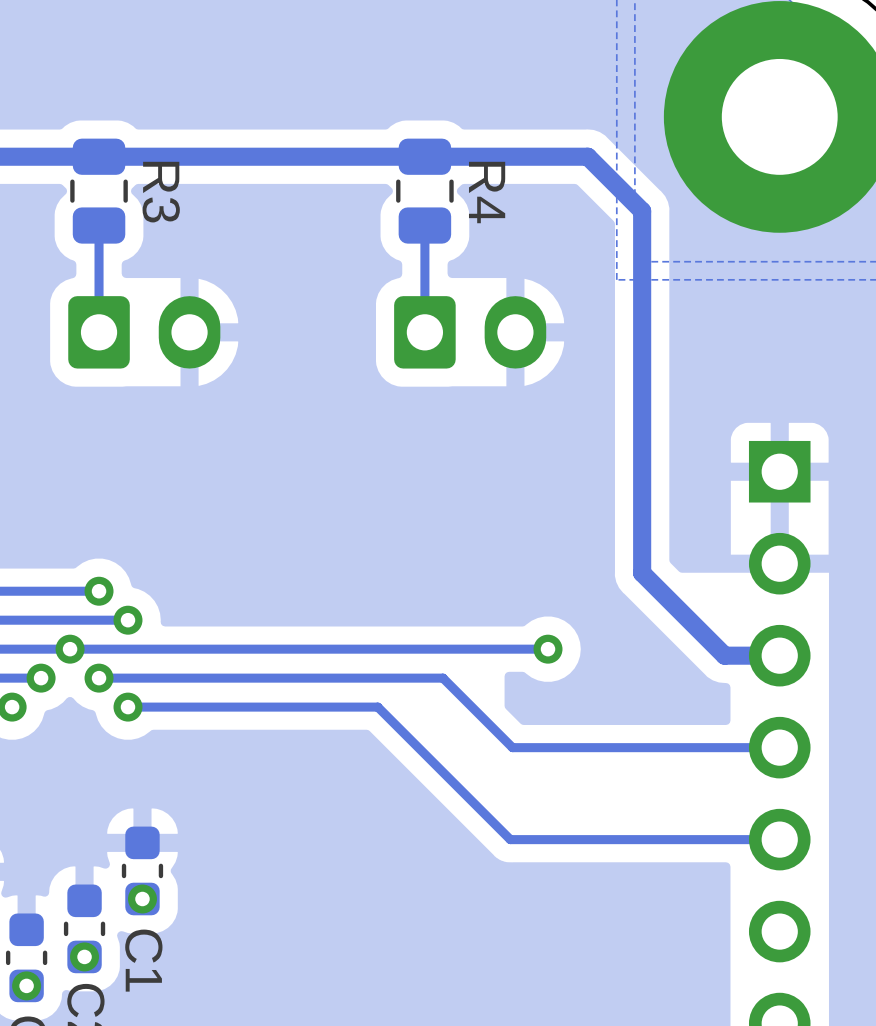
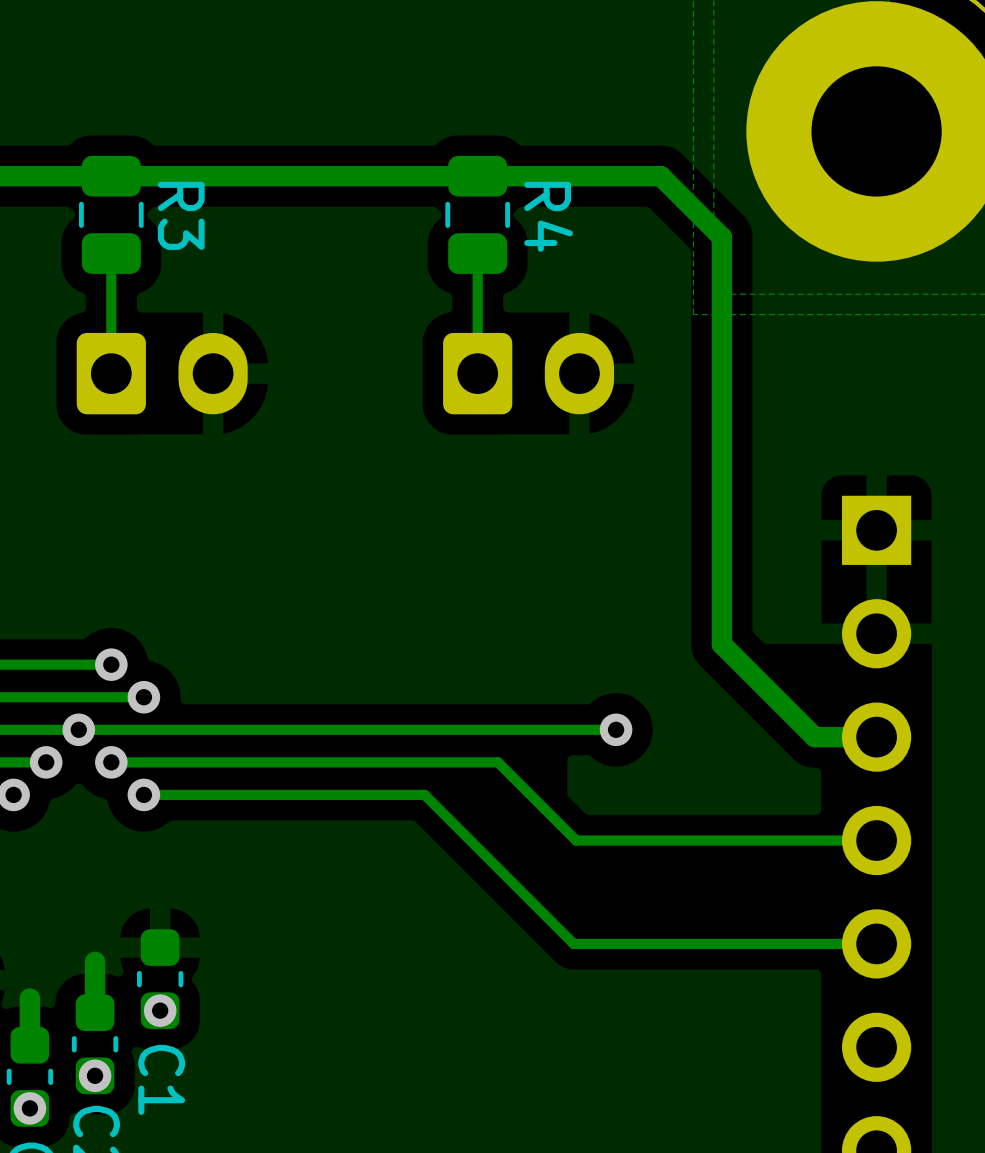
track: none -> (95, 961) (95, 1012)
track: none -> (29, 998) (29, 1045)

